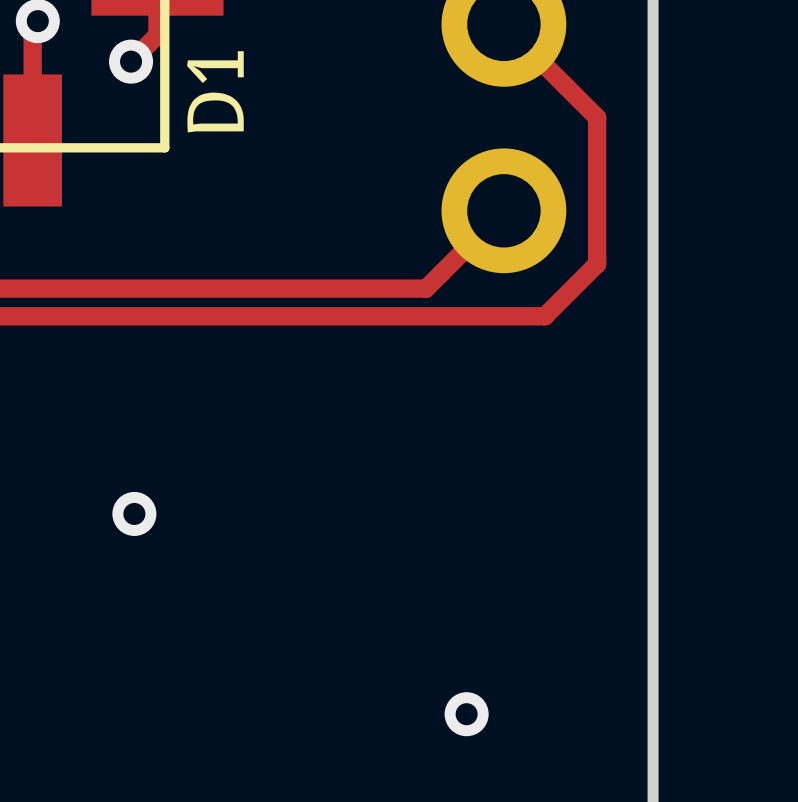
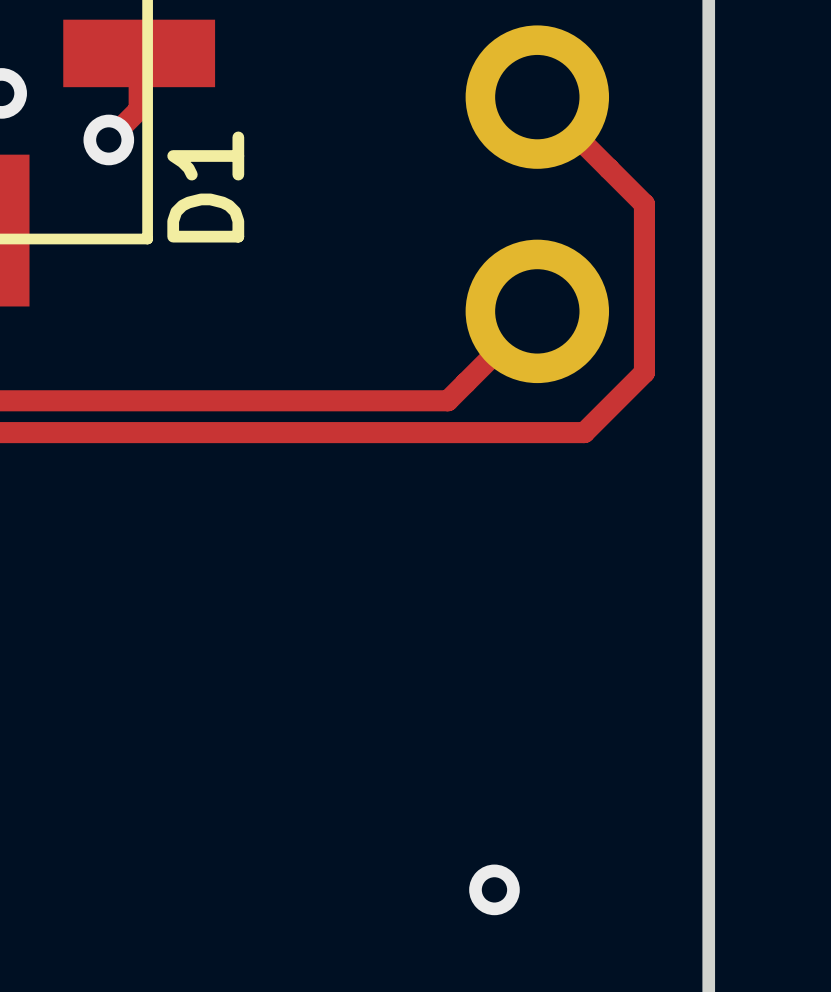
via: (134, 513) -> none

